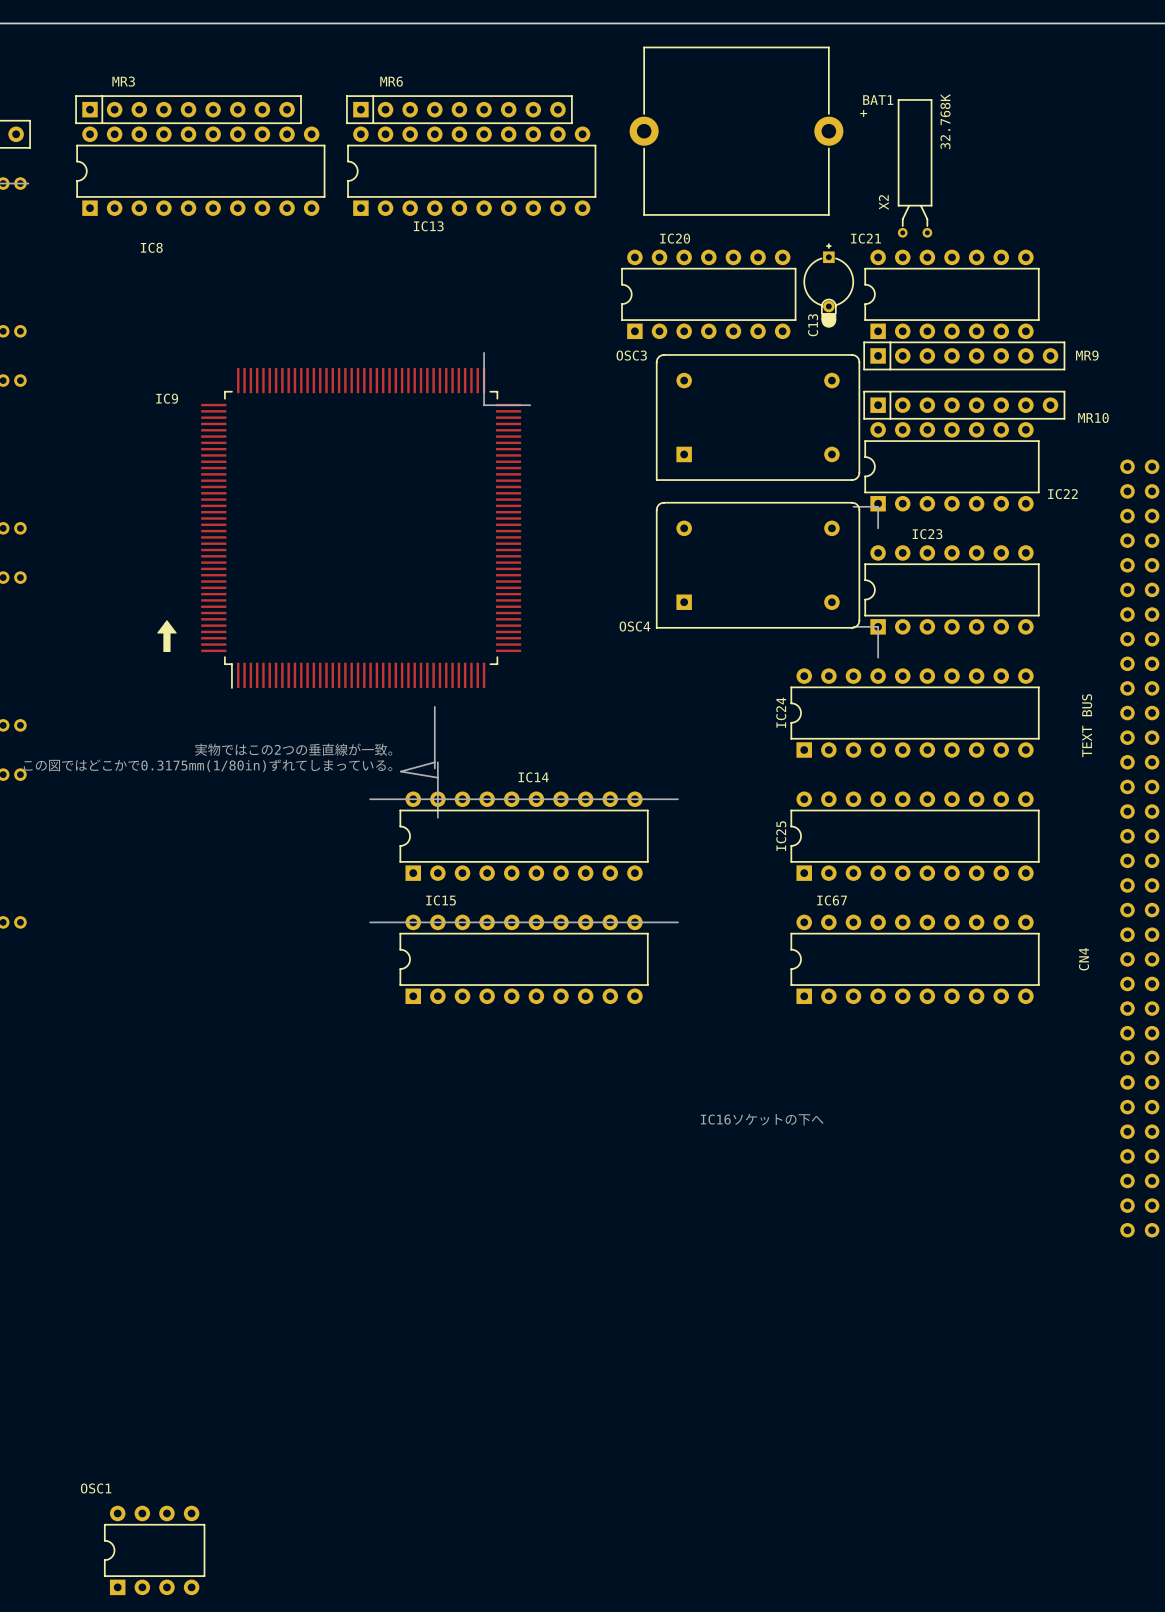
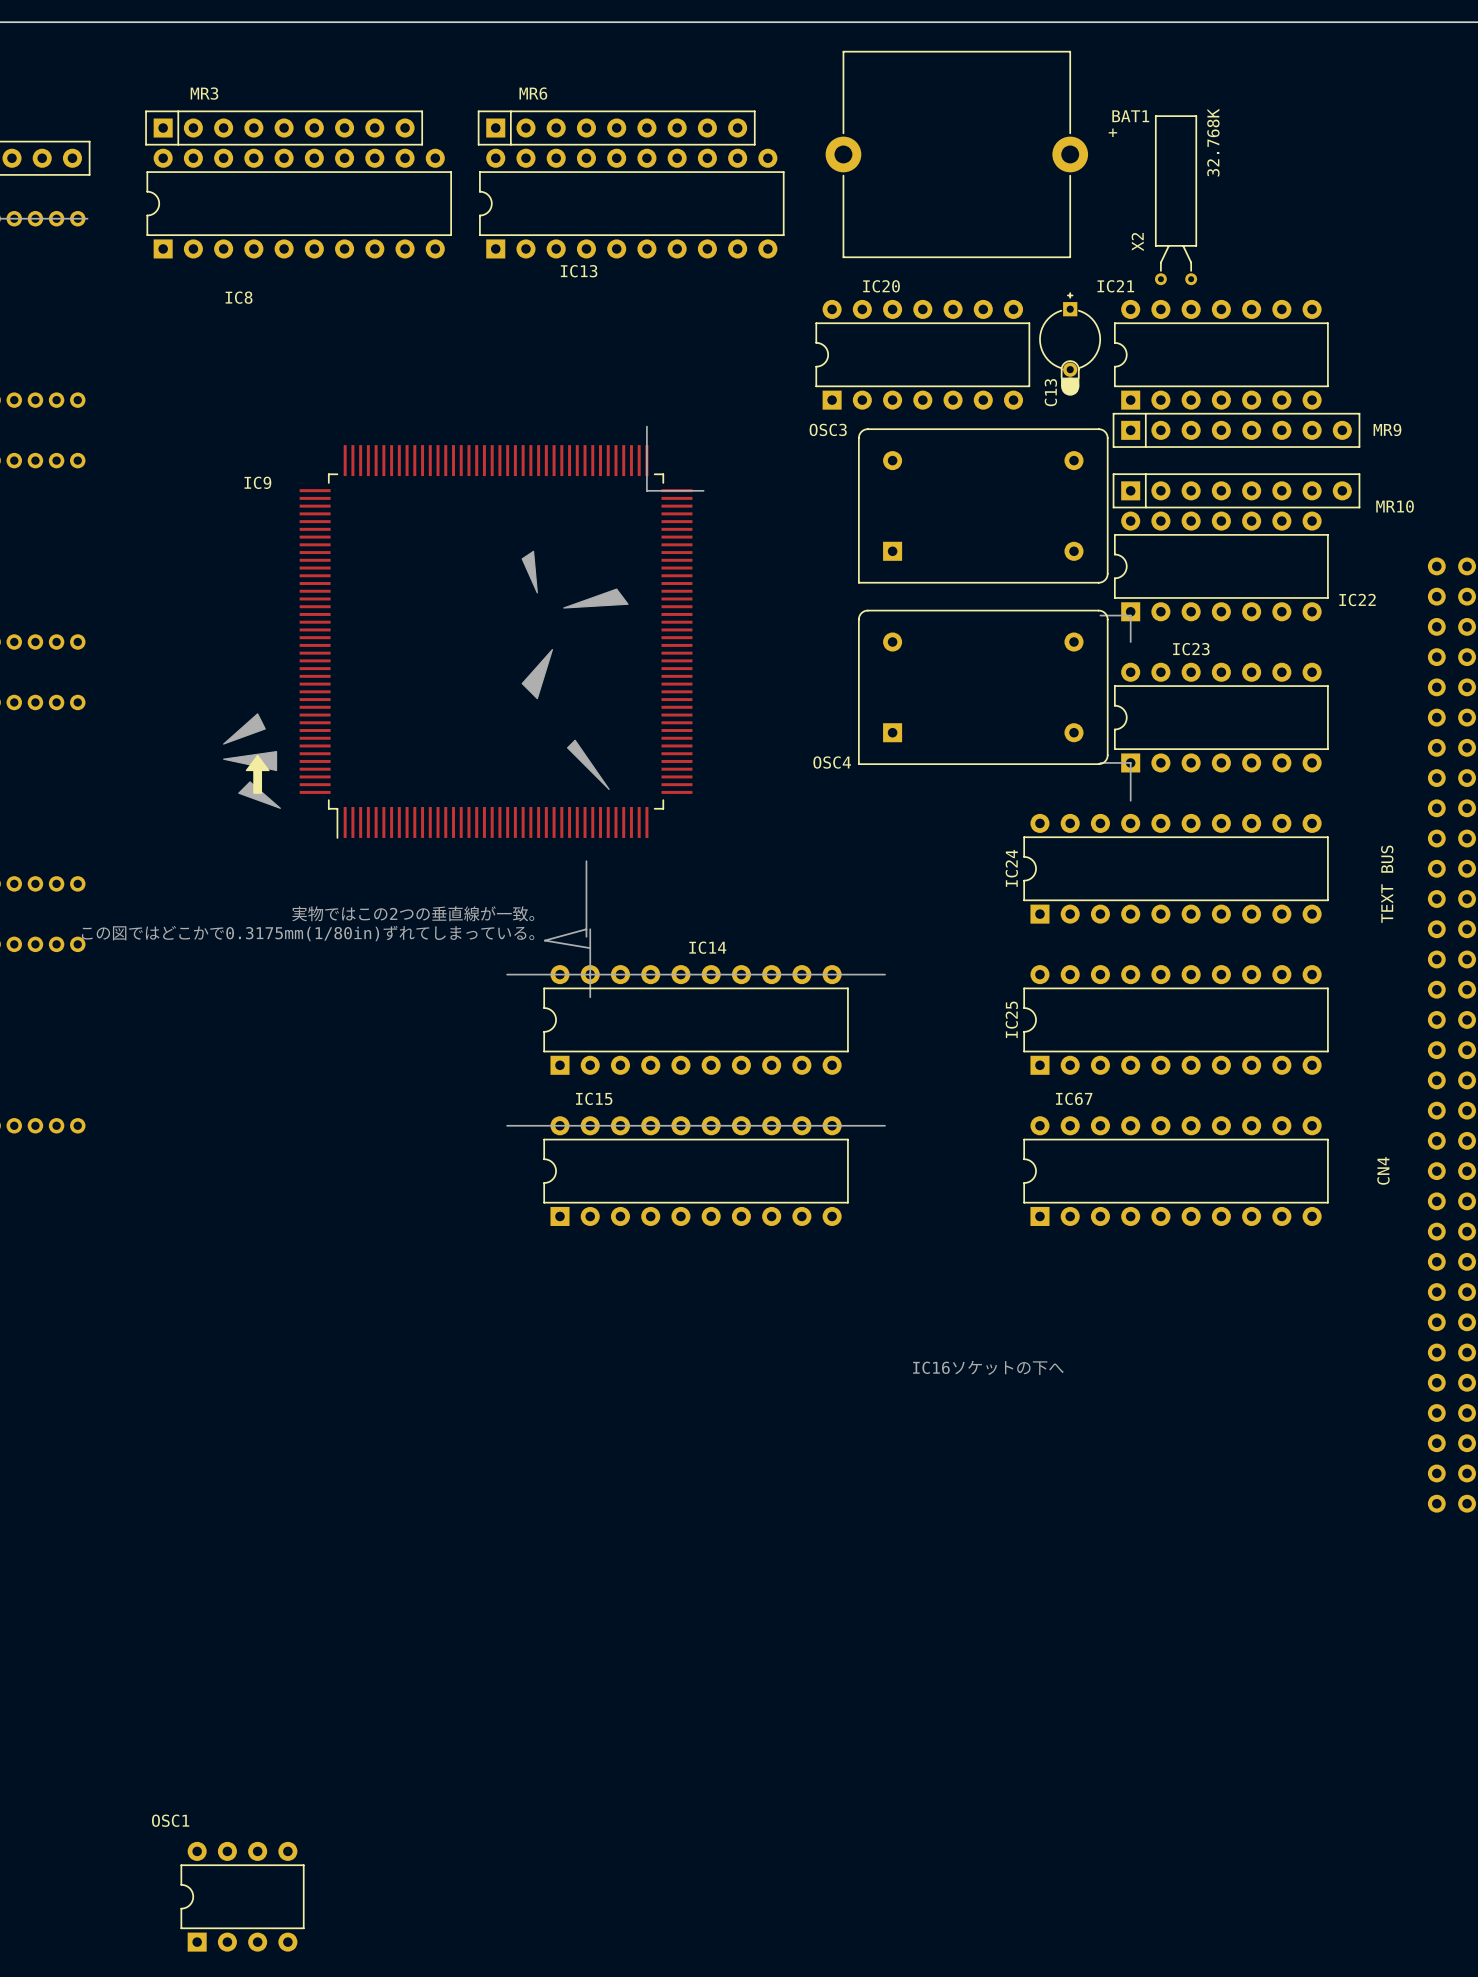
drawing: none -> [521, 550, 538, 594]
drawing: none -> [563, 588, 629, 609]
drawing: none -> [521, 648, 554, 700]
drawing: none -> [223, 713, 281, 809]
drawing: none -> [566, 739, 610, 791]

